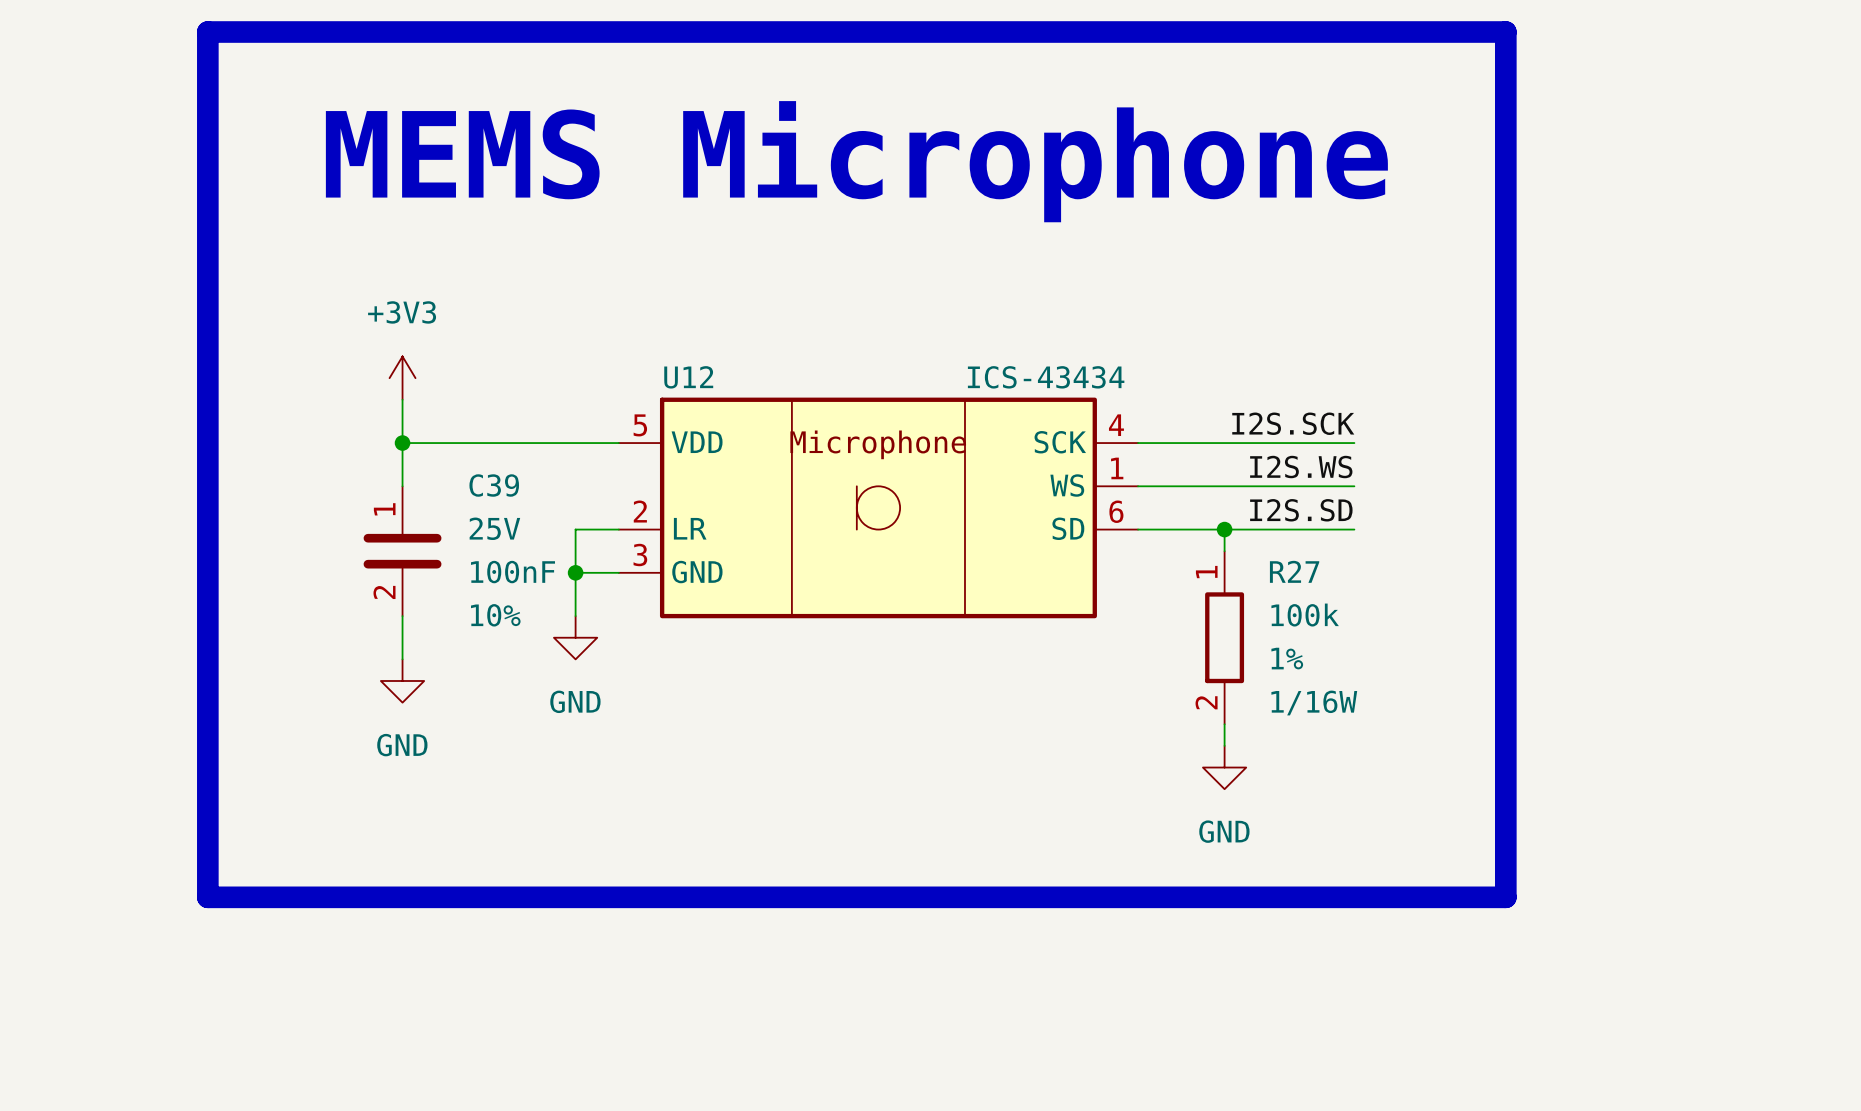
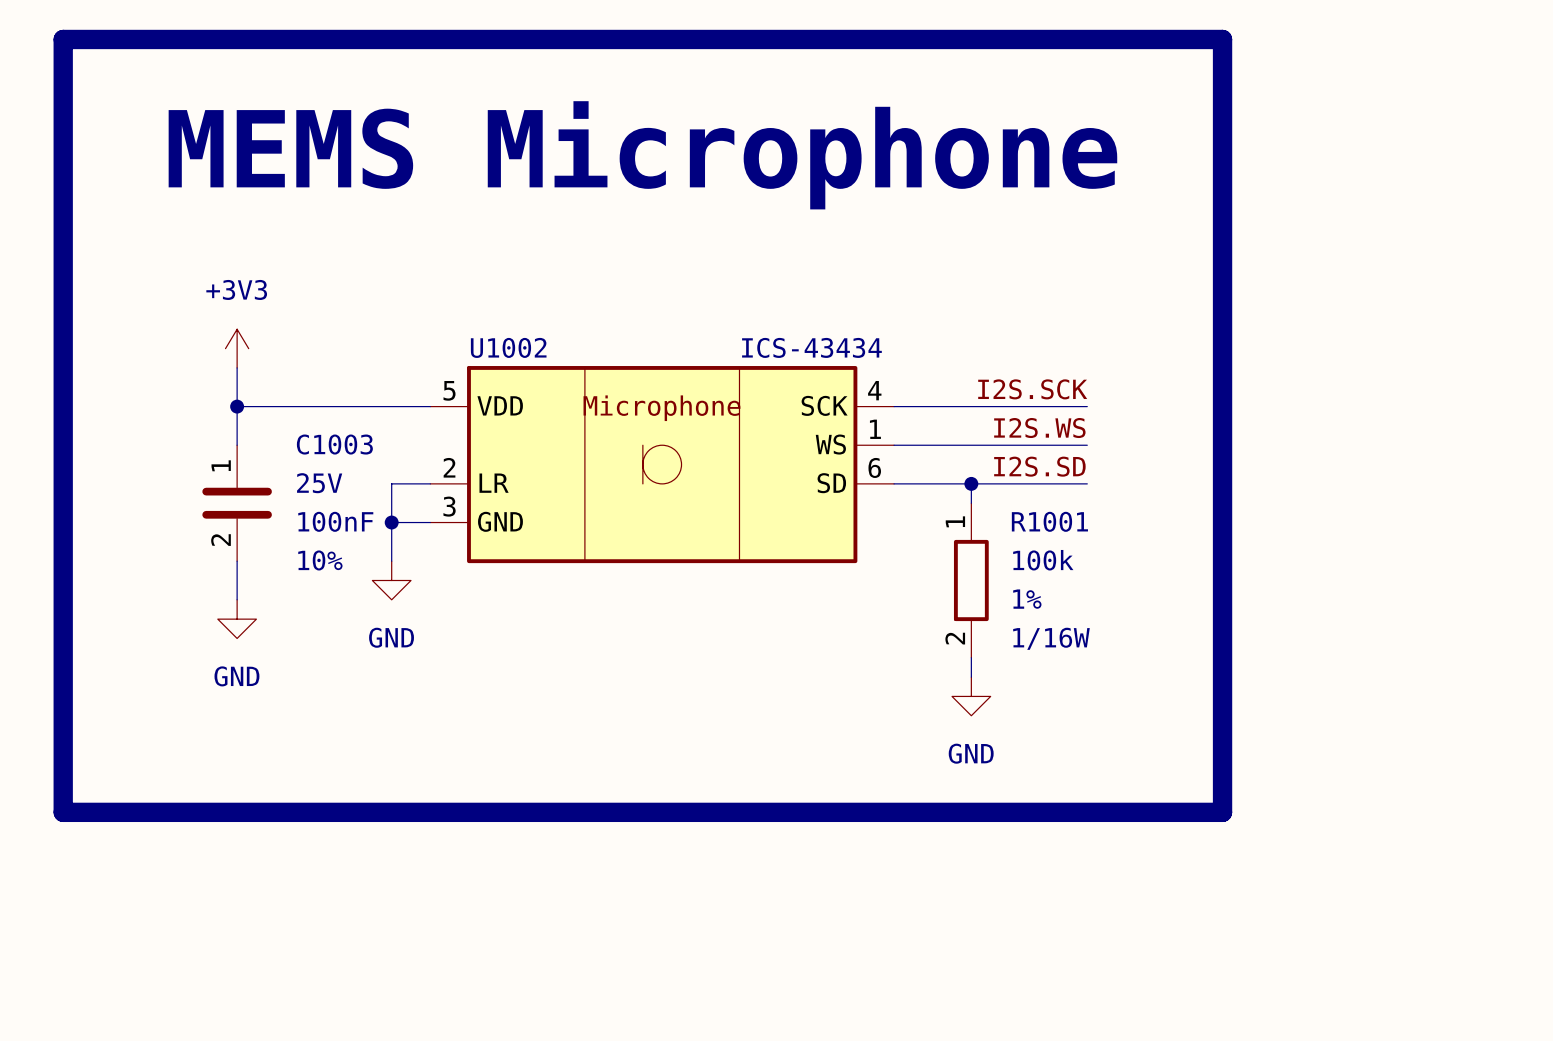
U12 name: U12 (688, 377) -> U1002 (508, 347)
C39 name: C39 (494, 485) -> C1003 (334, 444)
R27 name: R27 (1294, 571) -> R1001 (1049, 521)

